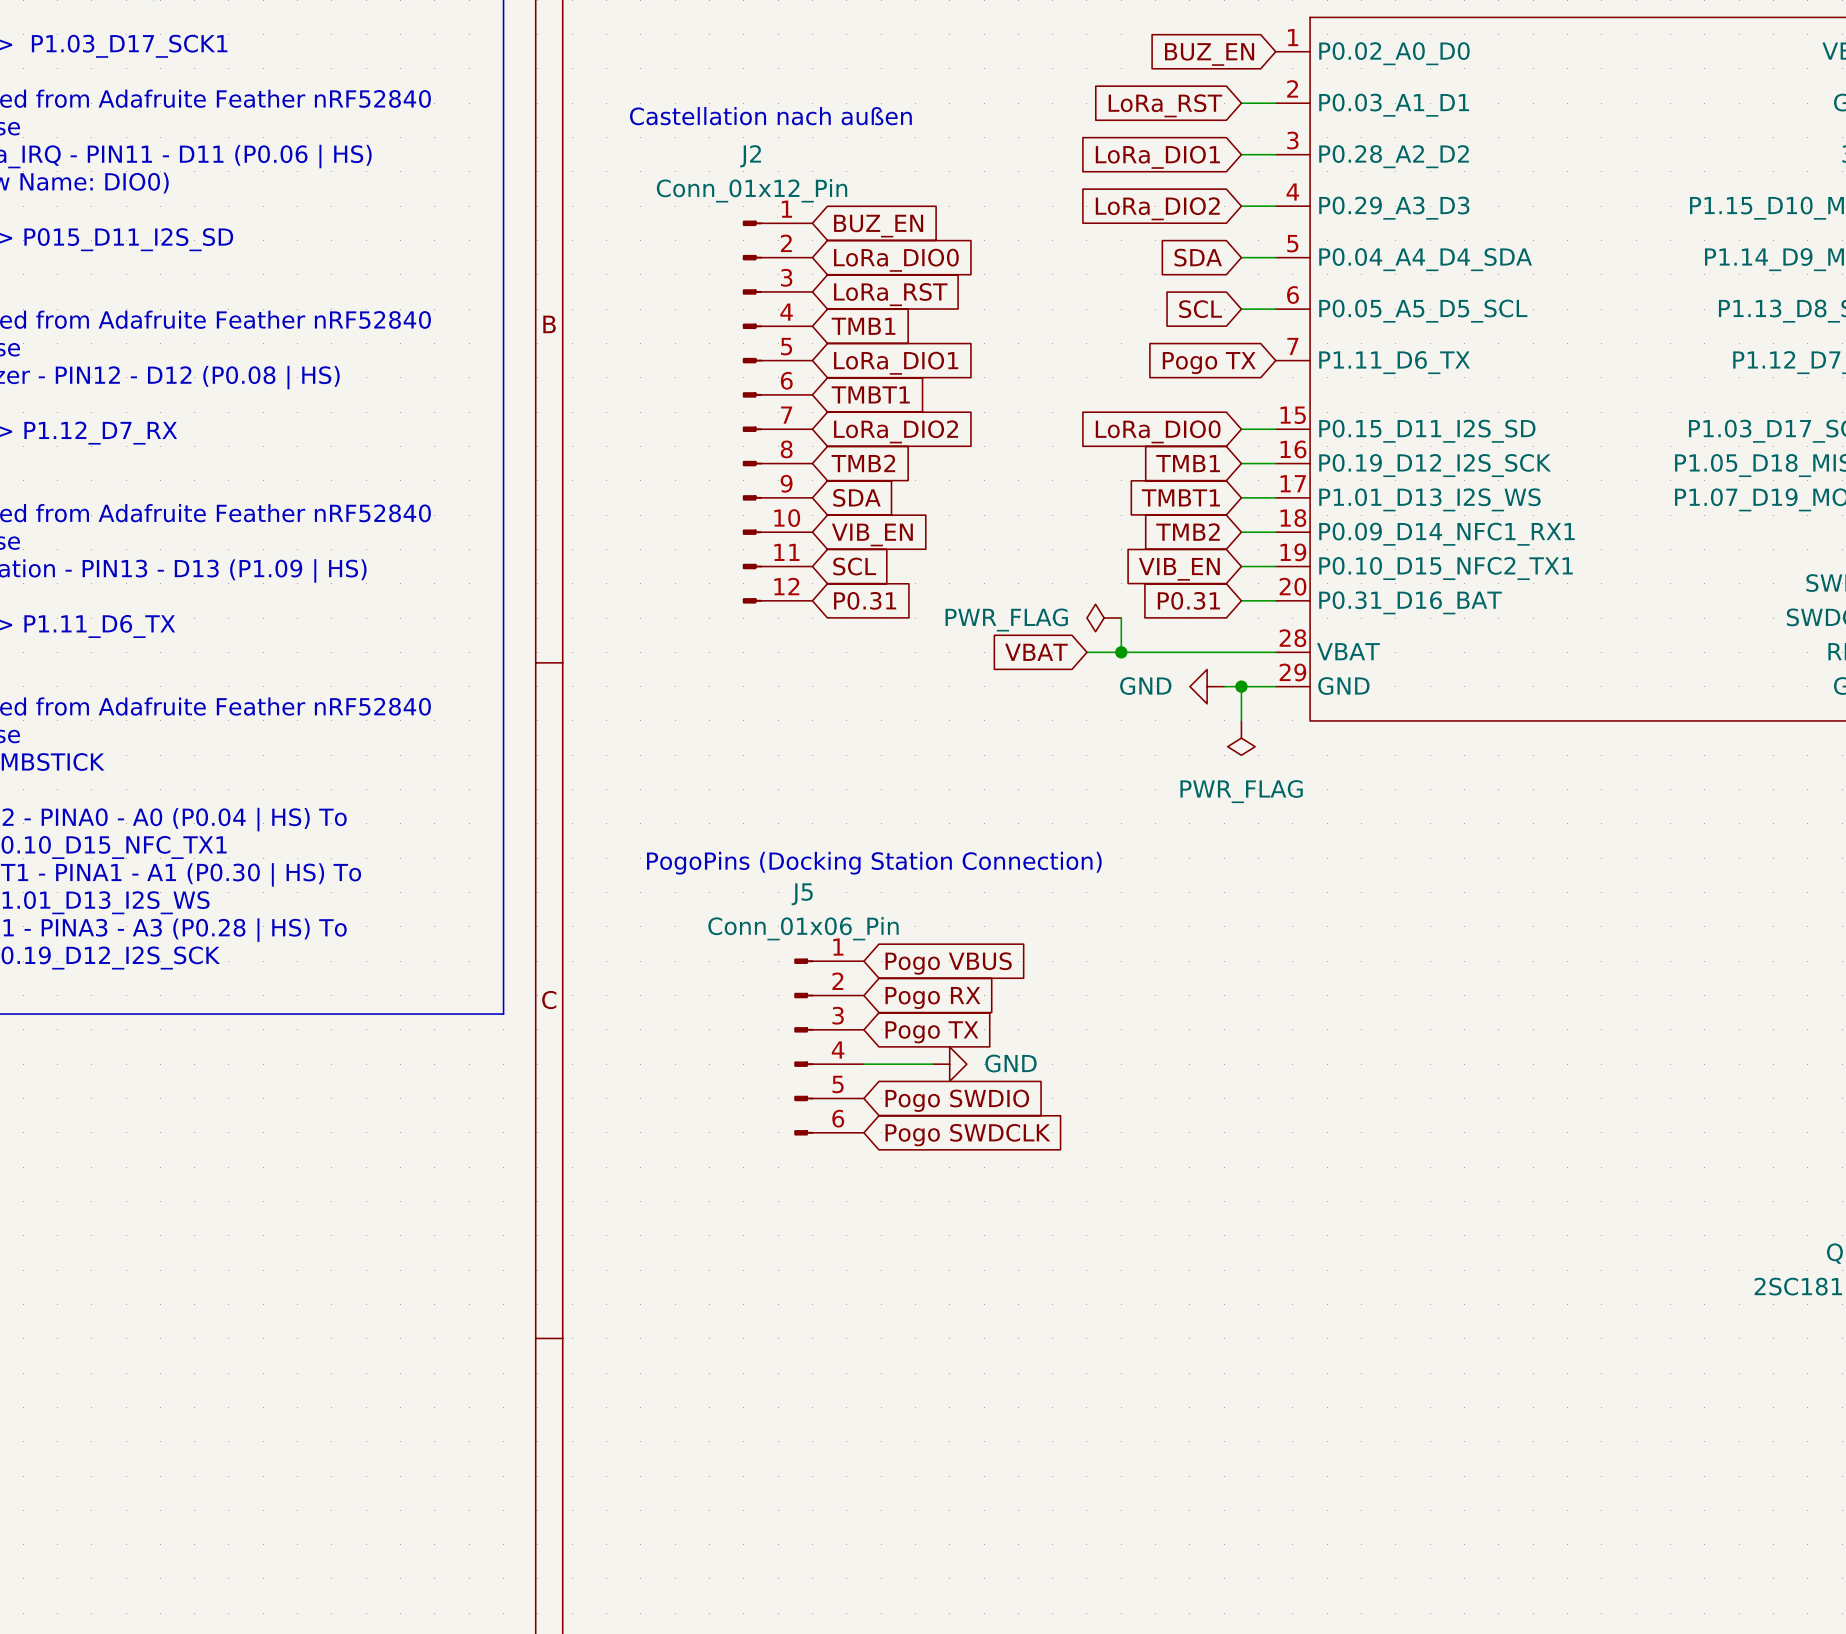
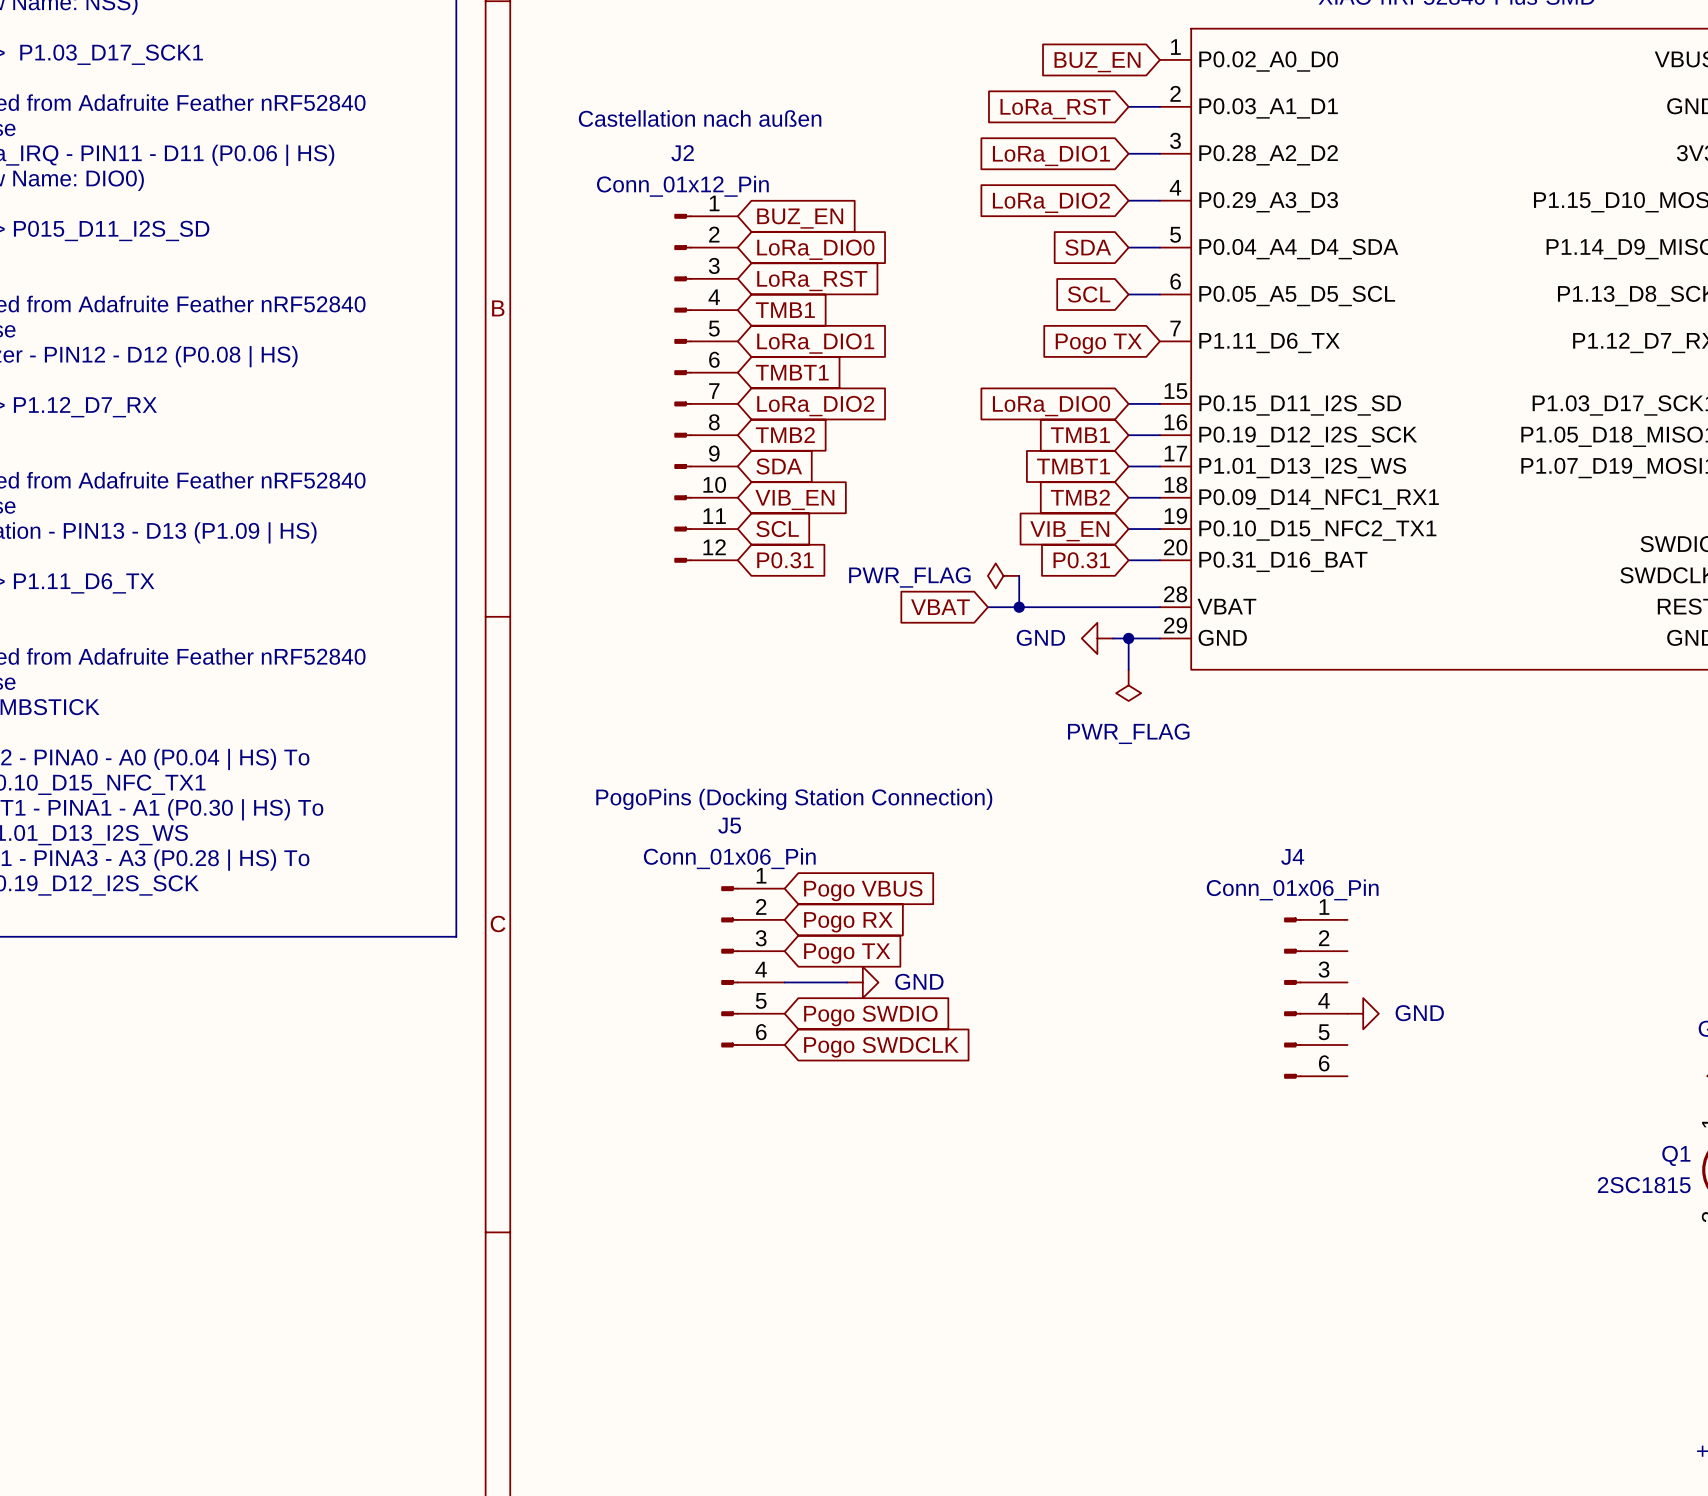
J4: none -> Conn_01x06_Pin (1315, 998)
power symbol: none -> GND (1363, 1013)

